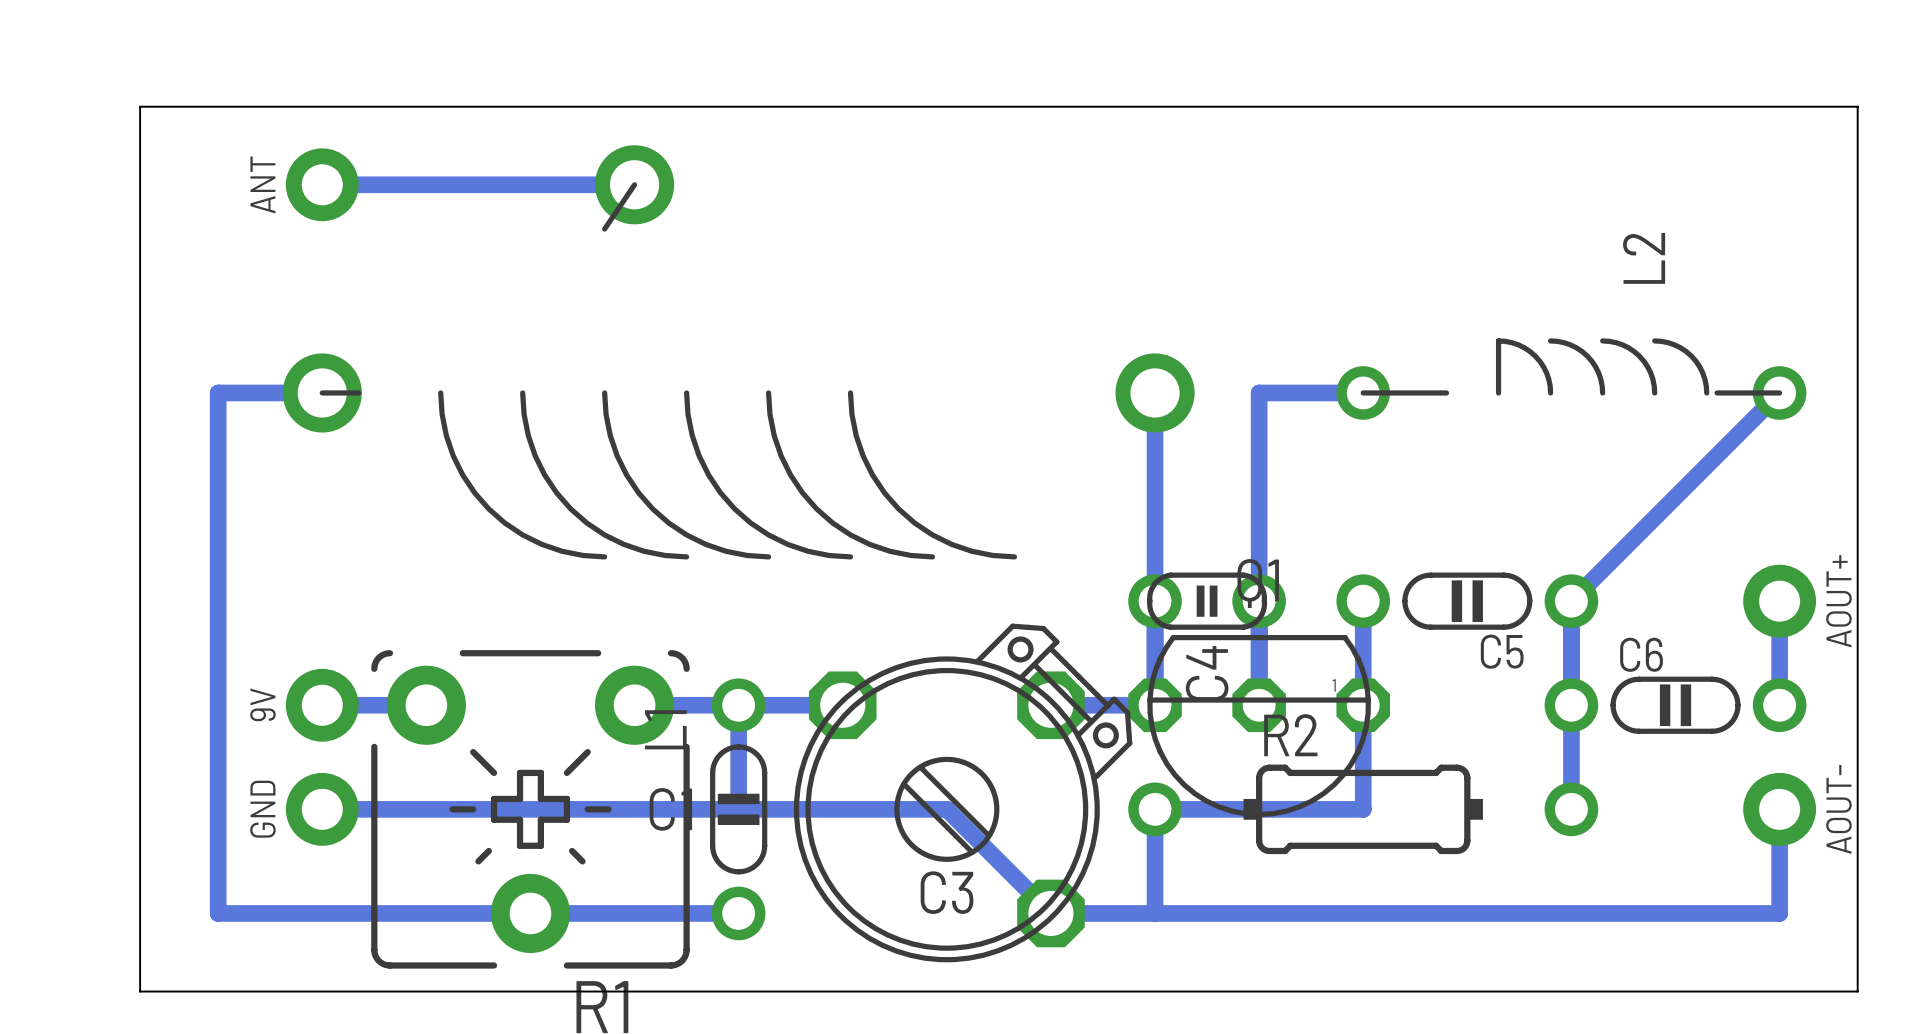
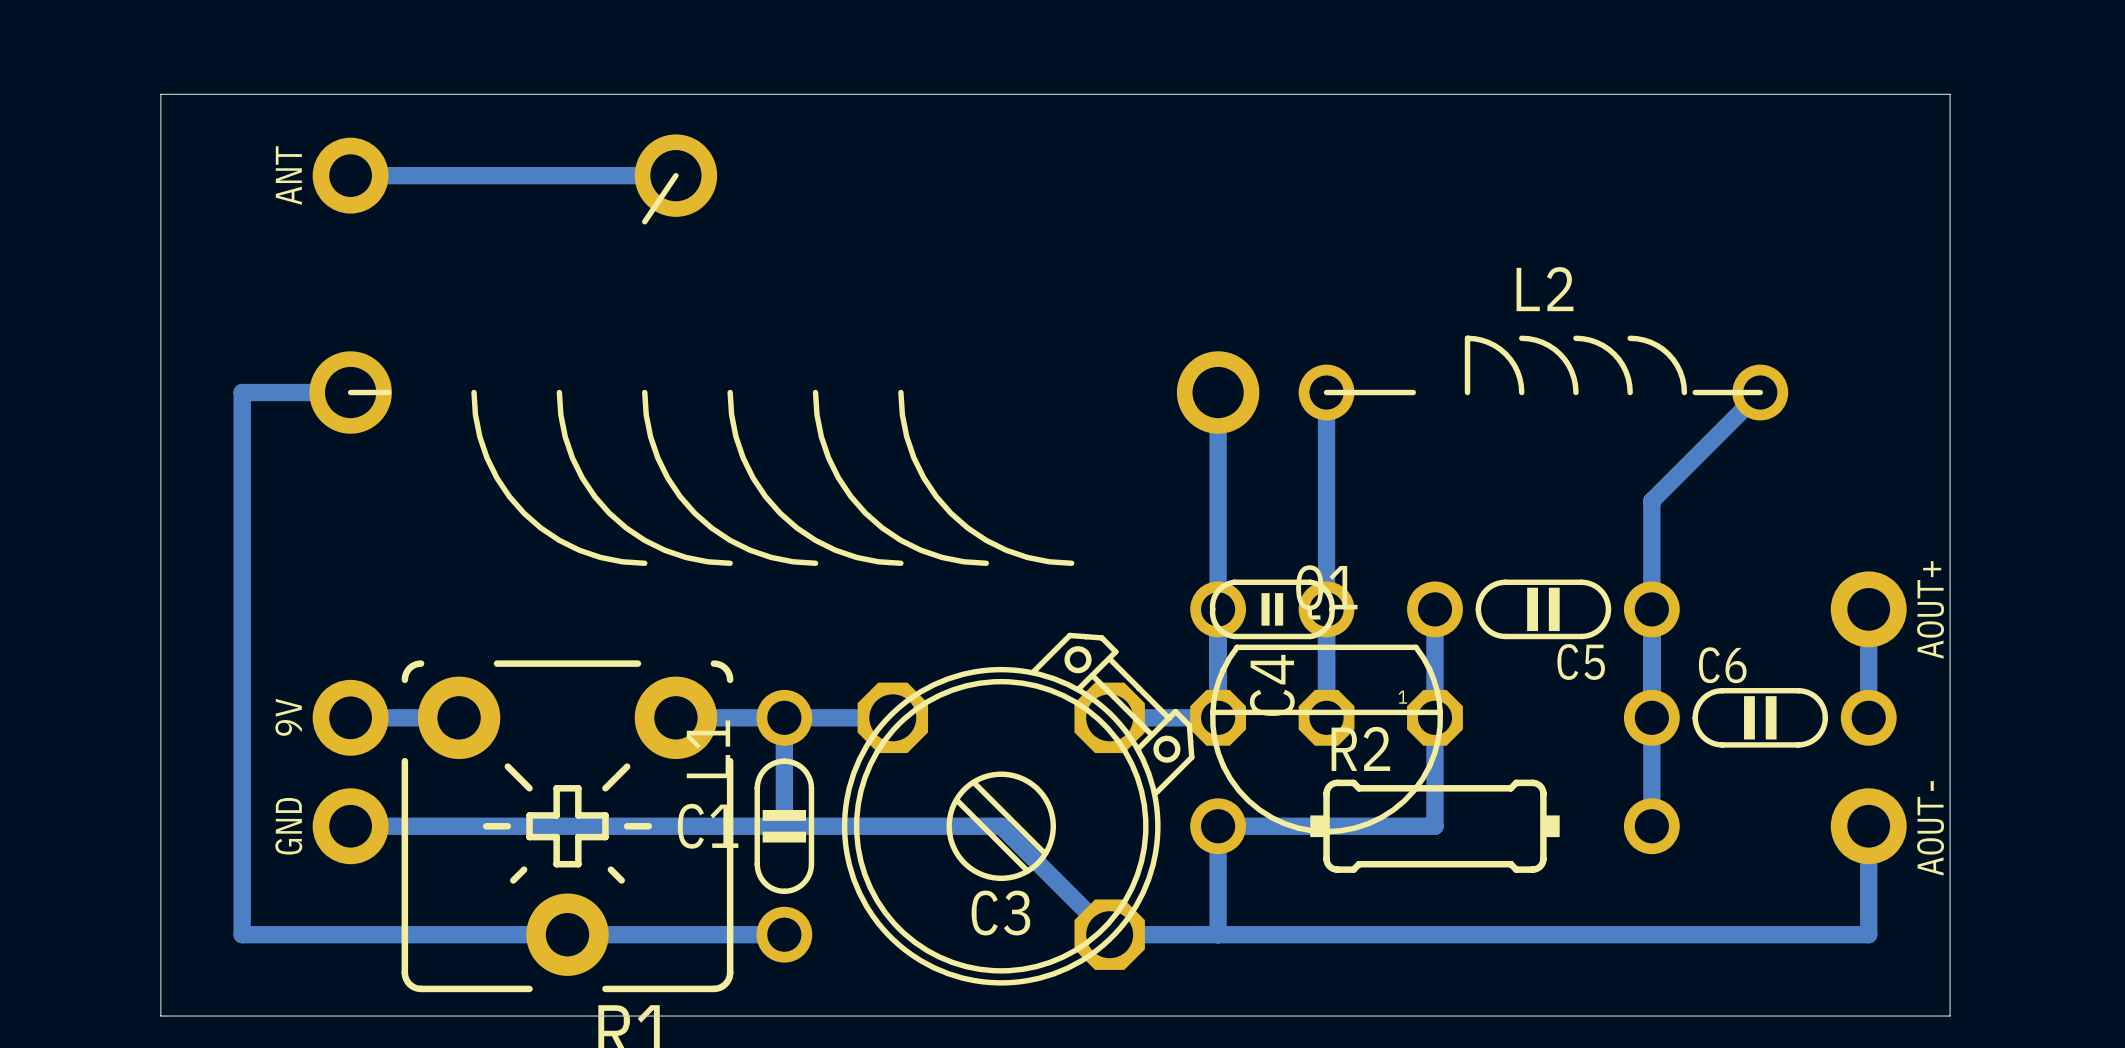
L2 name rotation: 0° (1644, 258) -> 90° clockwise (1545, 289)
L2 name position: L2 (1644, 258) -> L2 (1545, 289)
L2 position: (1571, 379) -> (1543, 378)
bottom track: (1259, 392) (1363, 392) -> none
bottom track: (1779, 392) (1571, 601) -> (1760, 392) (1651, 500) (1651, 609)

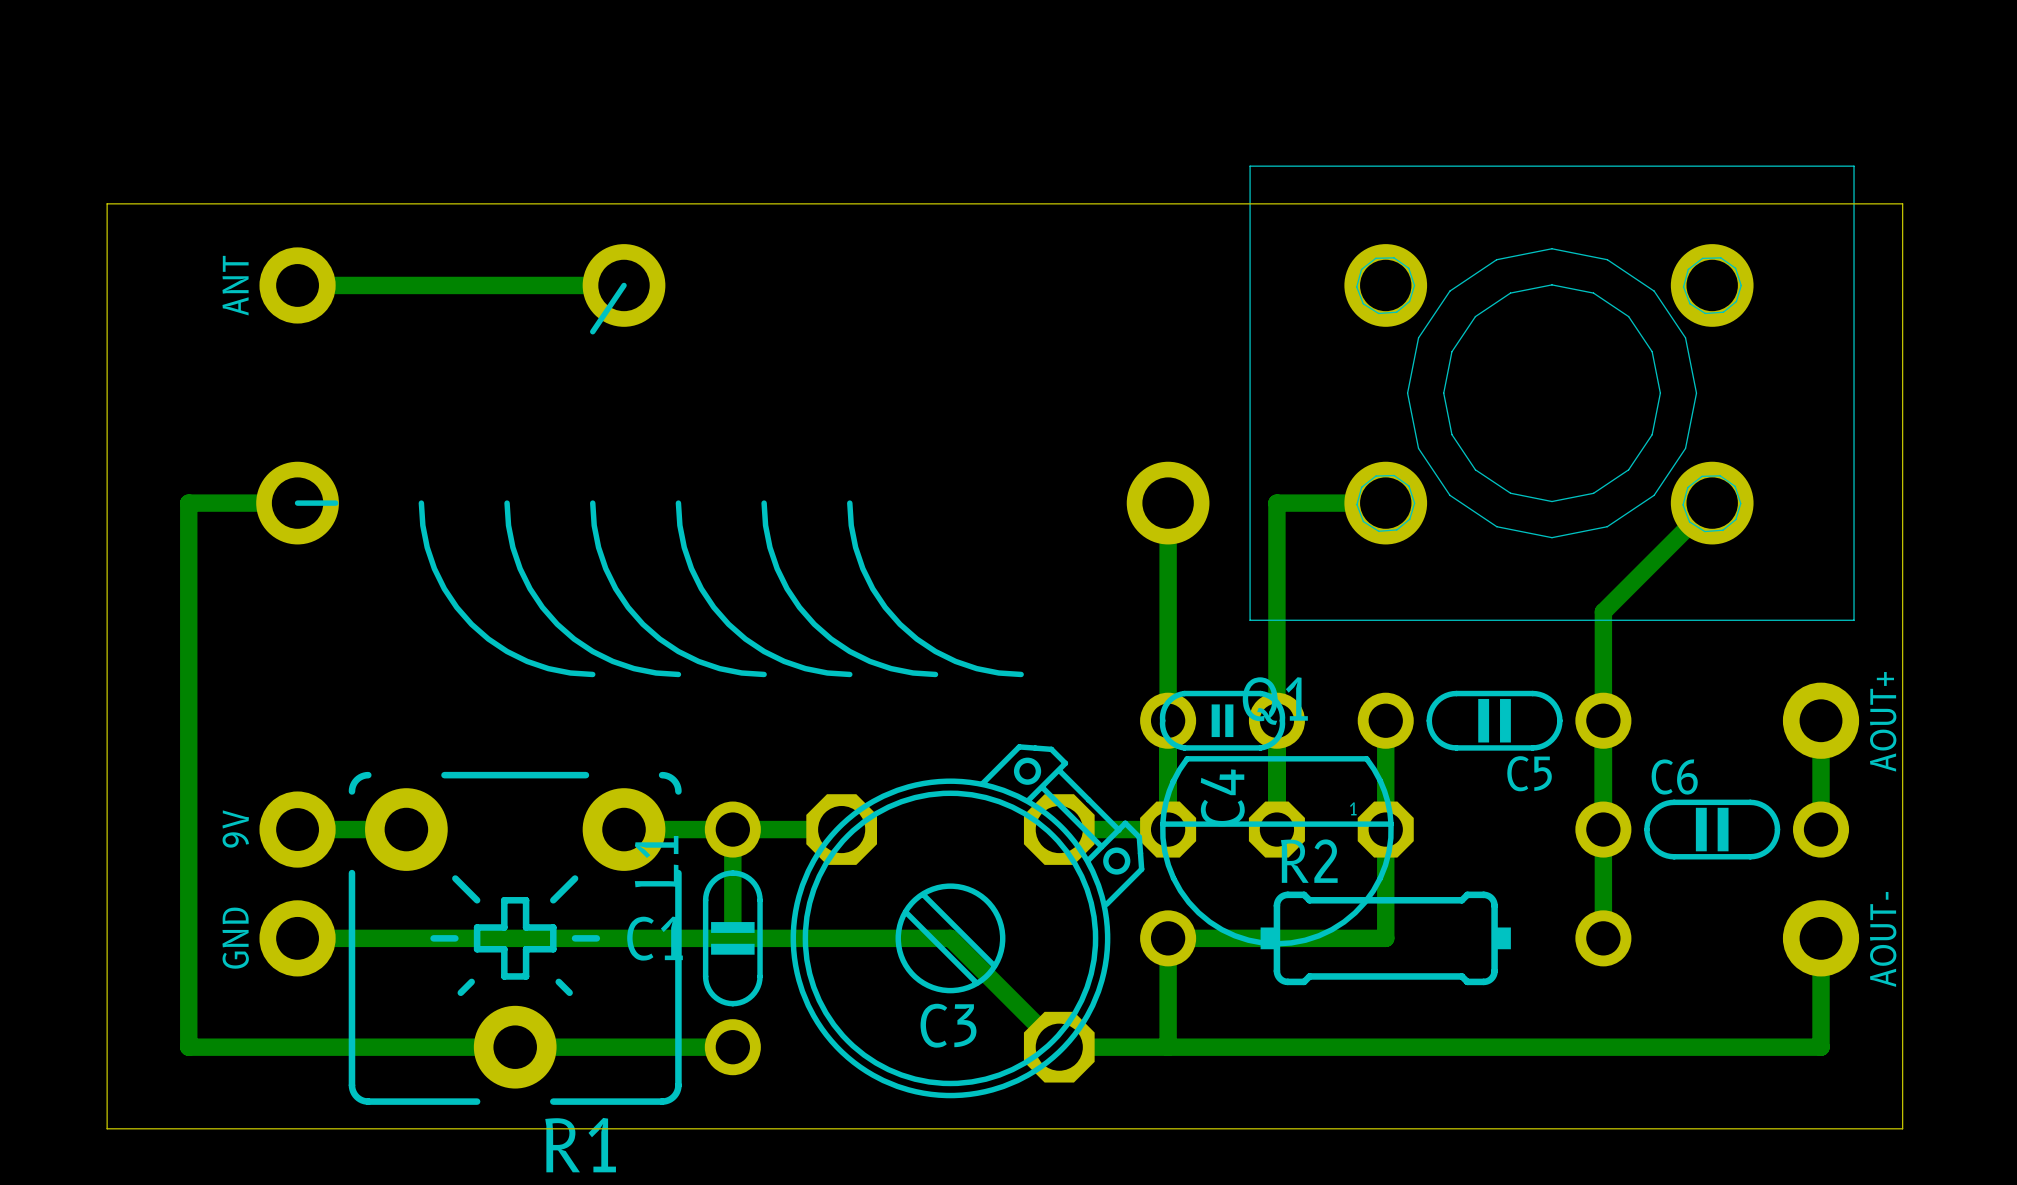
part: none -> (1552, 393)
L2: (1543, 378) -> none
bottom track: none -> (1276, 503) (1385, 503)

